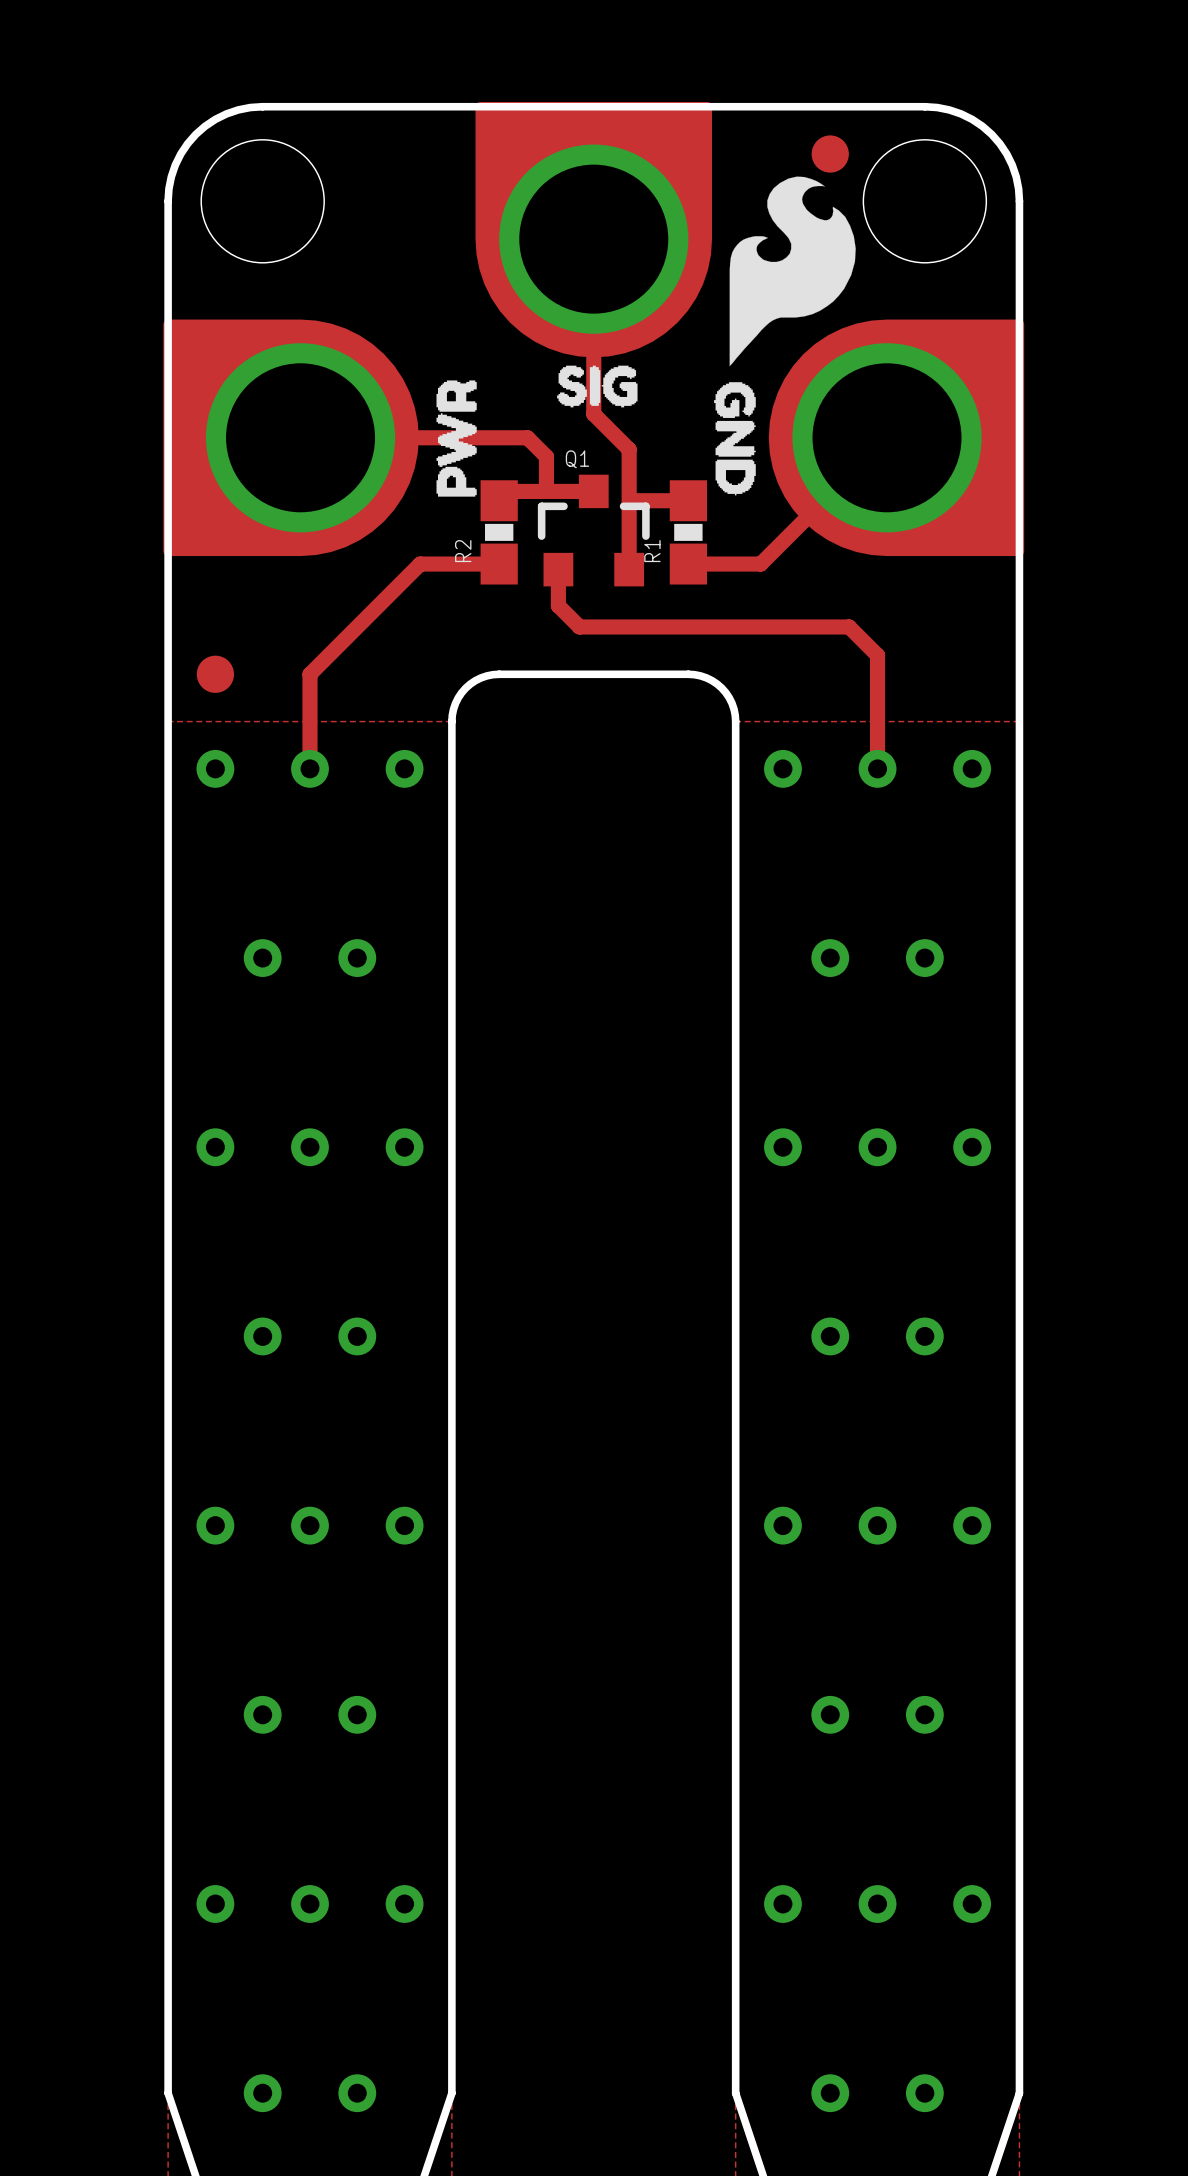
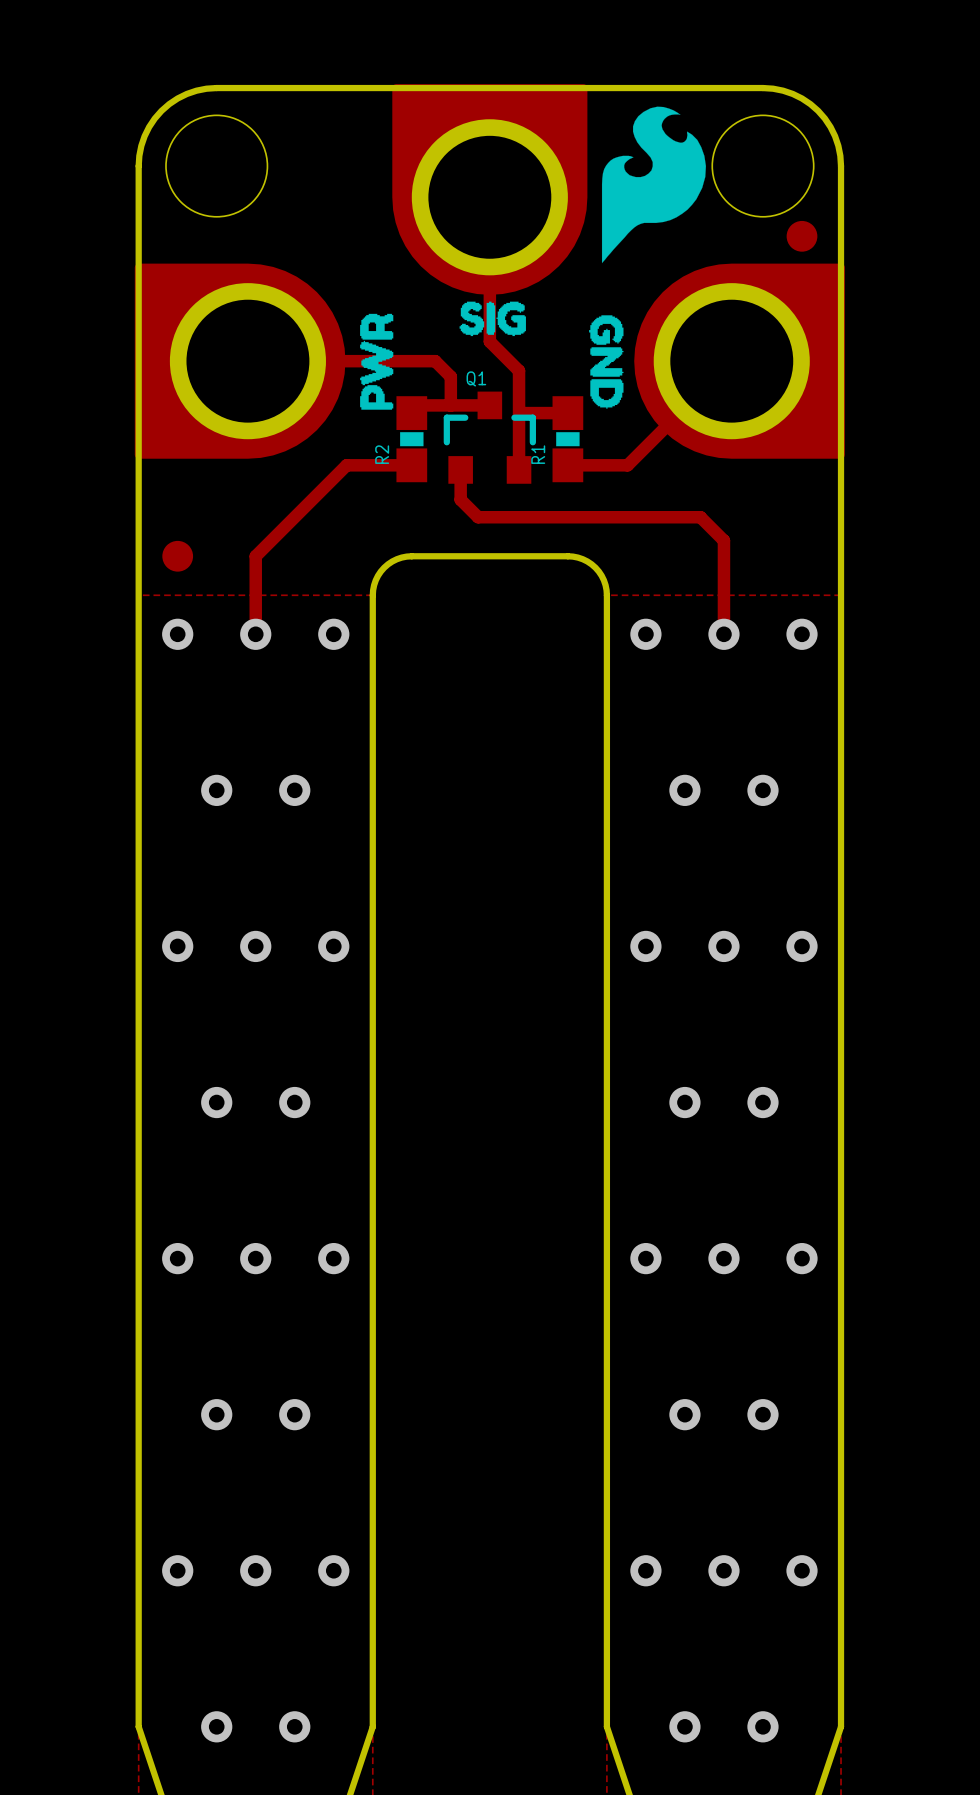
part position: (830, 154) -> (802, 236)
drawing position: (792, 271) -> (653, 184)

